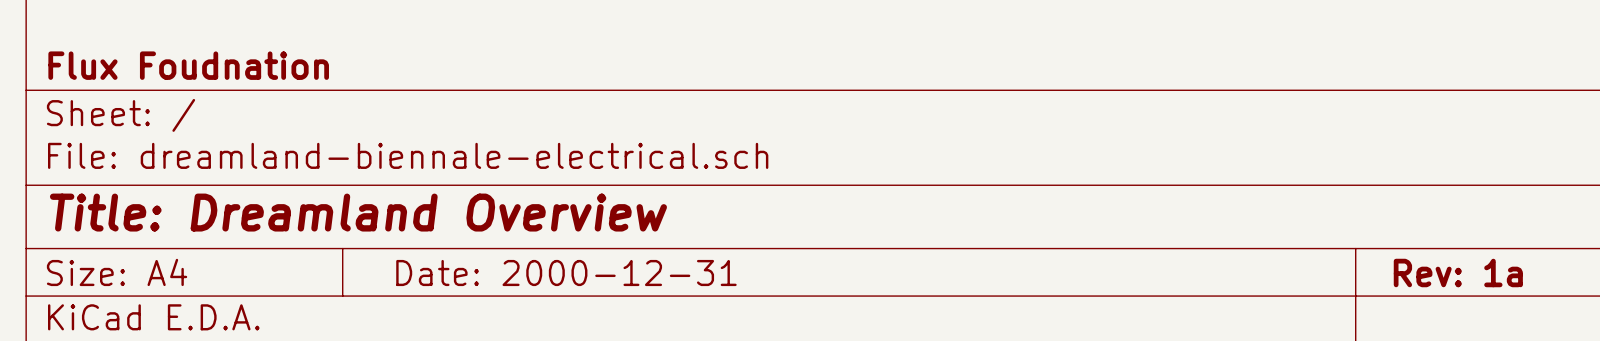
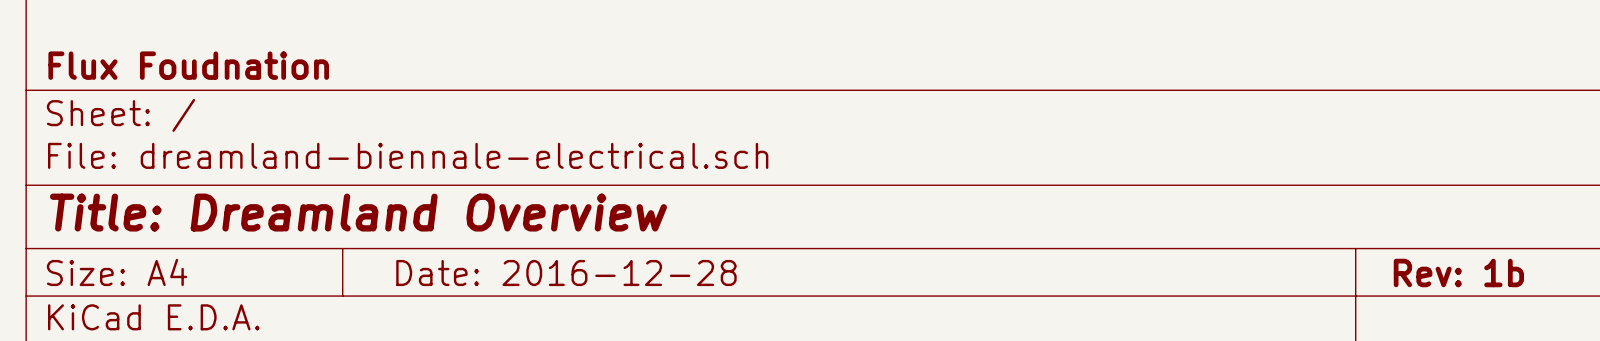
title block: Date: 2000-12-31 (566, 273) -> Date: 2016-12-28 (566, 273)
title block: Rev: 1a (1458, 273) -> Rev: 1b (1458, 273)

